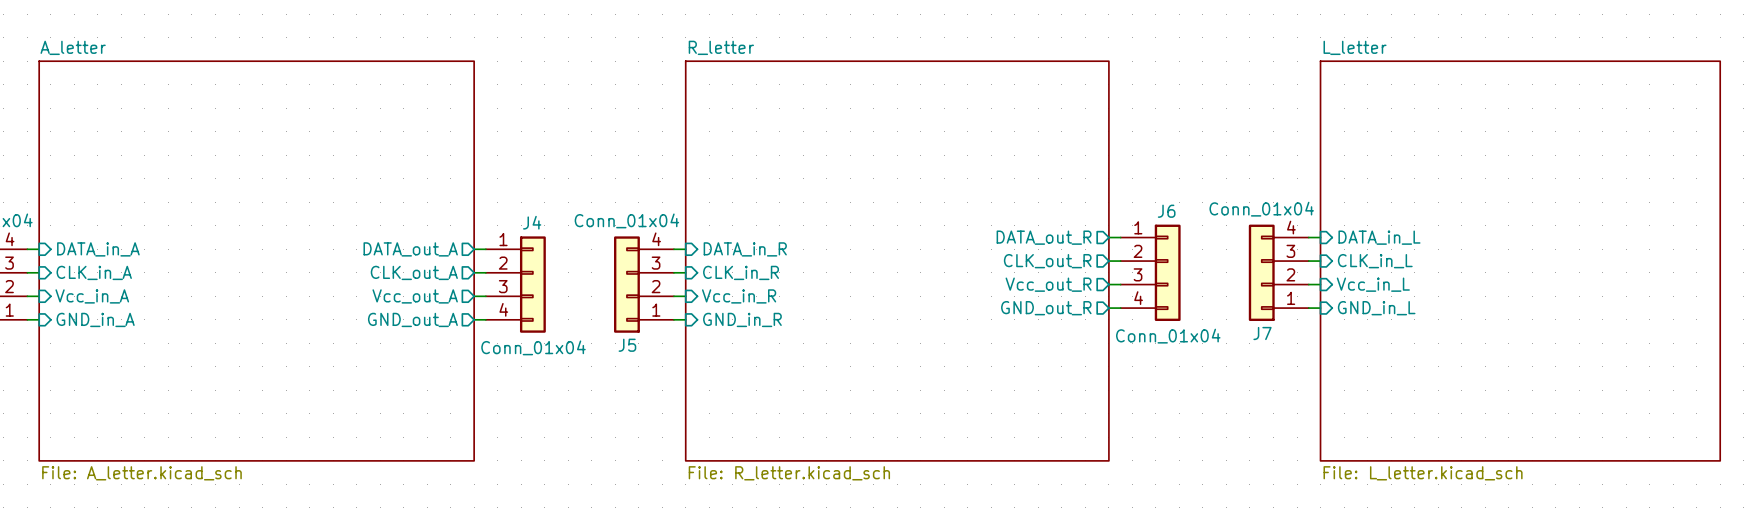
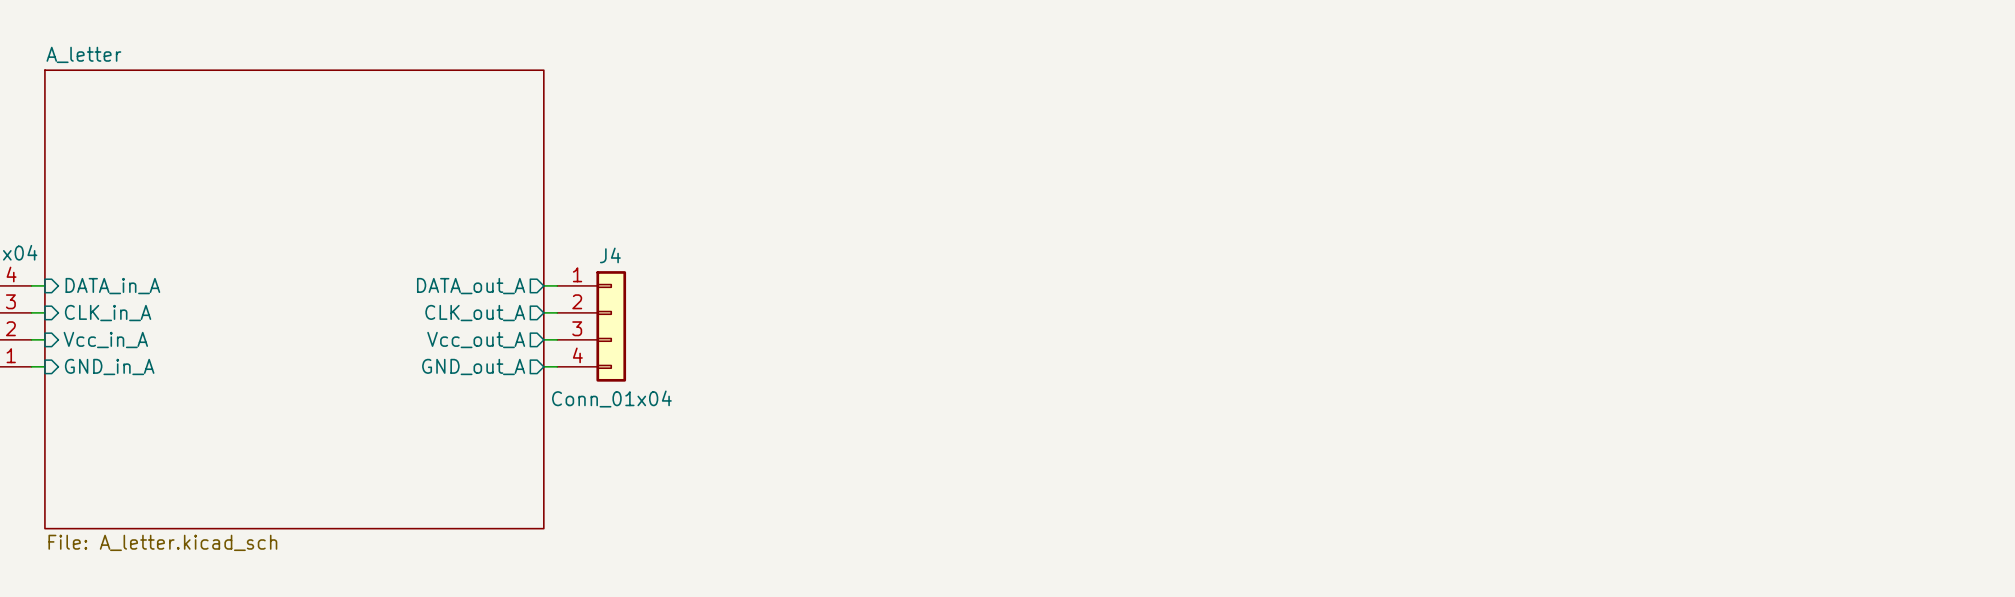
sheet pin: DATA_out_R (1044, 237) -> none
wire: (1108, 237) (1120, 237) -> none
wire: (1308, 237) (1320, 237) -> none
sheet pin: DATA_in_L (1379, 237) -> none
wire: (673, 249) (685, 249) -> none
sheet pin: DATA_in_R (745, 249) -> none
sheet R_letter: File: R_letter.kicad_sch (897, 261) -> none
sheet pin: CLK_out_R (1047, 261) -> none
wire: (1108, 261) (1120, 261) -> none
wire: (1308, 261) (1320, 261) -> none
sheet pin: CLK_in_L (1375, 261) -> none
sheet L_letter: File: L_letter.kicad_sch (1520, 261) -> none
wire: (673, 272) (685, 272) -> none
sheet pin: CLK_in_R (741, 272) -> none
J6: Conn_01x04 (1150, 272) -> none
J7: Conn_01x04 (1278, 272) -> none
J5: Conn_01x04 (643, 284) -> none
sheet pin: Vcc_out_R (1048, 284) -> none
wire: (1108, 284) (1120, 284) -> none
wire: (1308, 284) (1320, 284) -> none
sheet pin: Vcc_in_L (1373, 284) -> none
wire: (673, 296) (685, 296) -> none
sheet pin: Vcc_in_R (739, 296) -> none
sheet pin: GND_out_R (1046, 308) -> none
wire: (1108, 308) (1120, 308) -> none
wire: (1308, 308) (1320, 308) -> none
sheet pin: GND_in_L (1376, 308) -> none
wire: (673, 319) (685, 319) -> none
sheet pin: GND_in_R (742, 319) -> none

